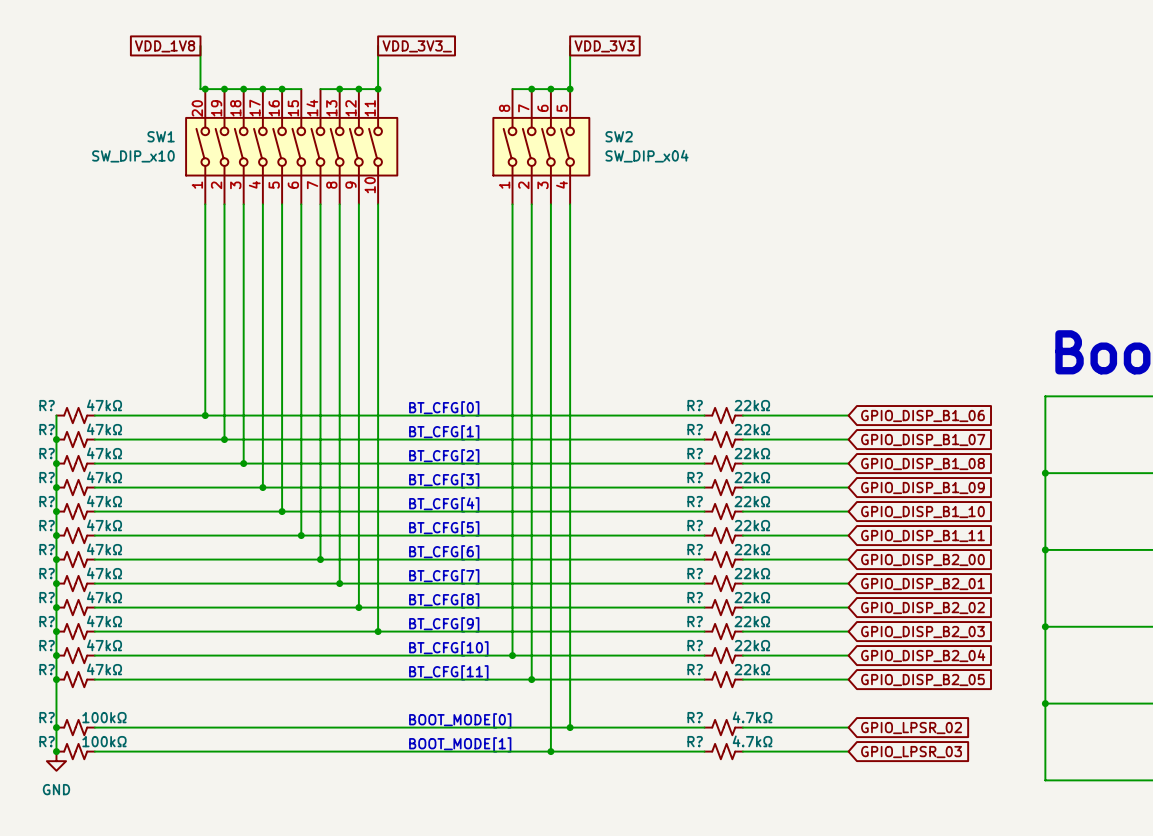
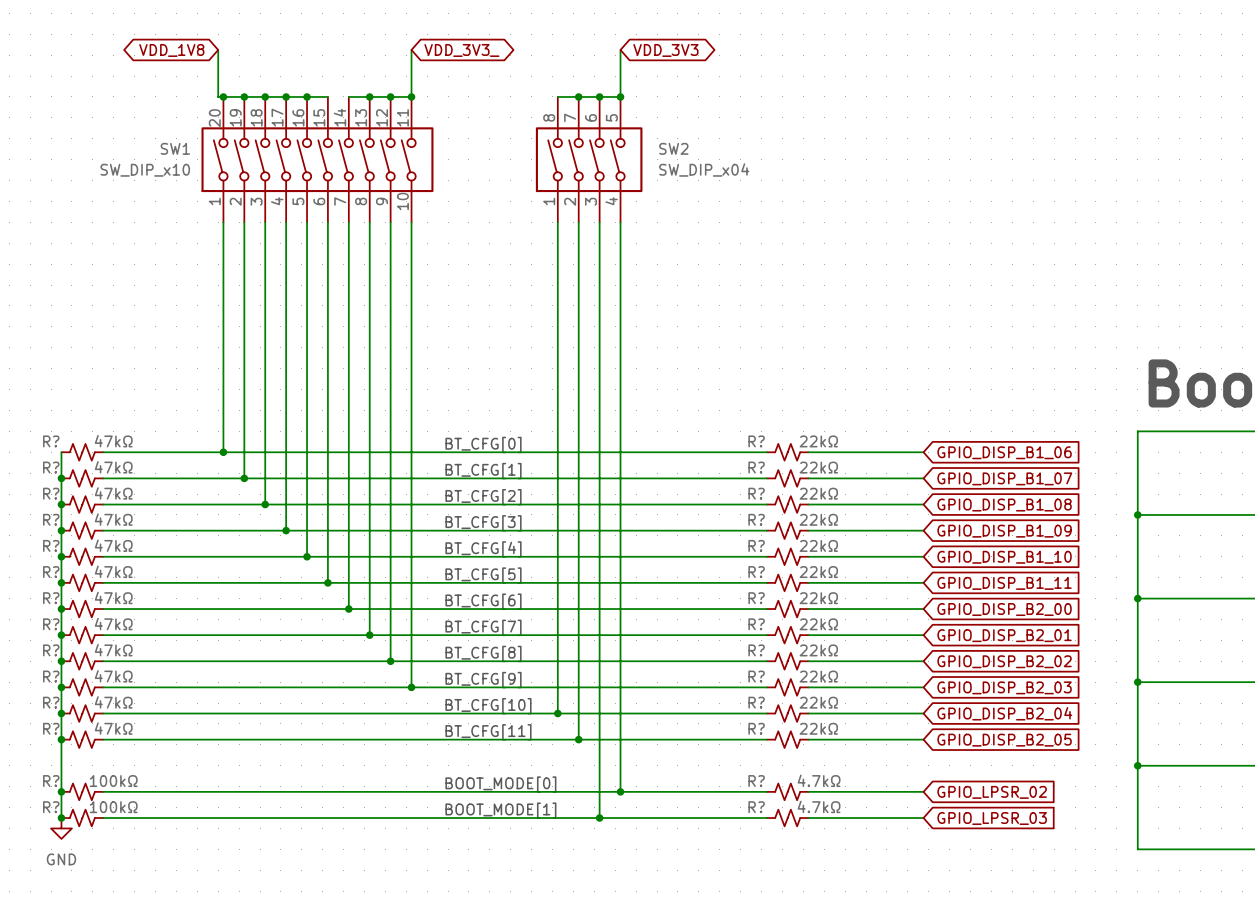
global label shape: passive (165, 46) -> bidirectional (171, 50)
global label shape: passive (417, 46) -> bidirectional (461, 50)
global label shape: passive (604, 46) -> bidirectional (665, 50)

